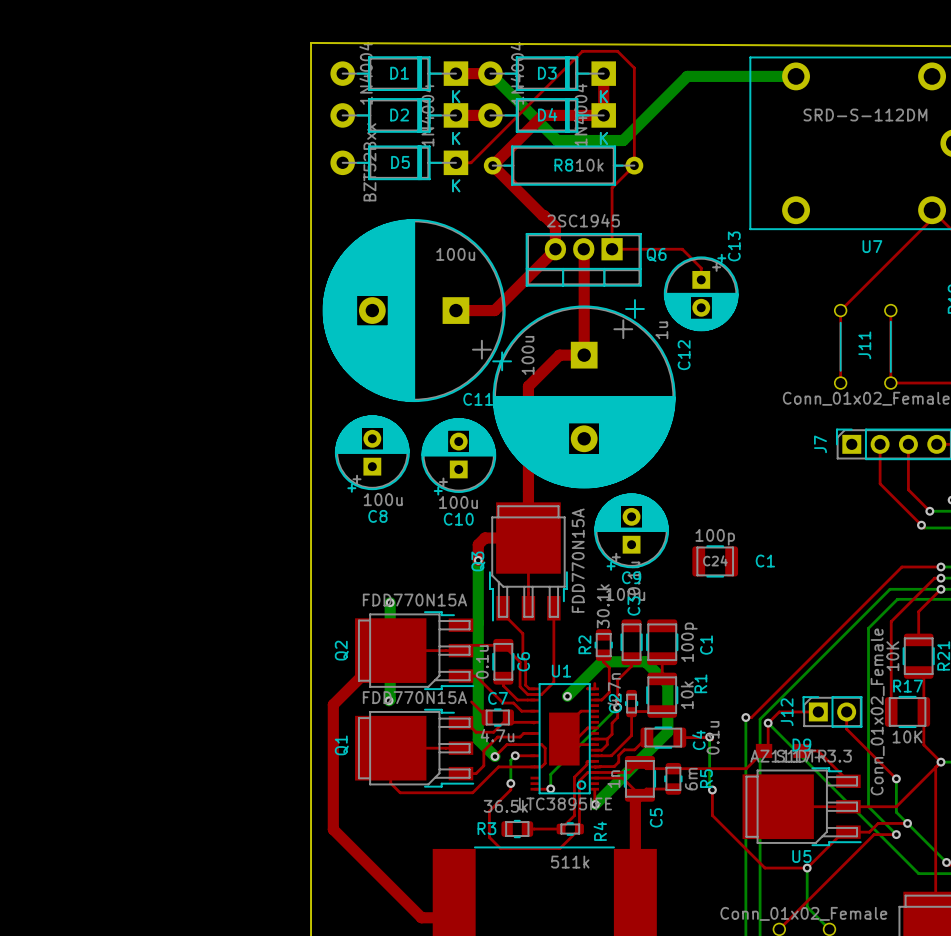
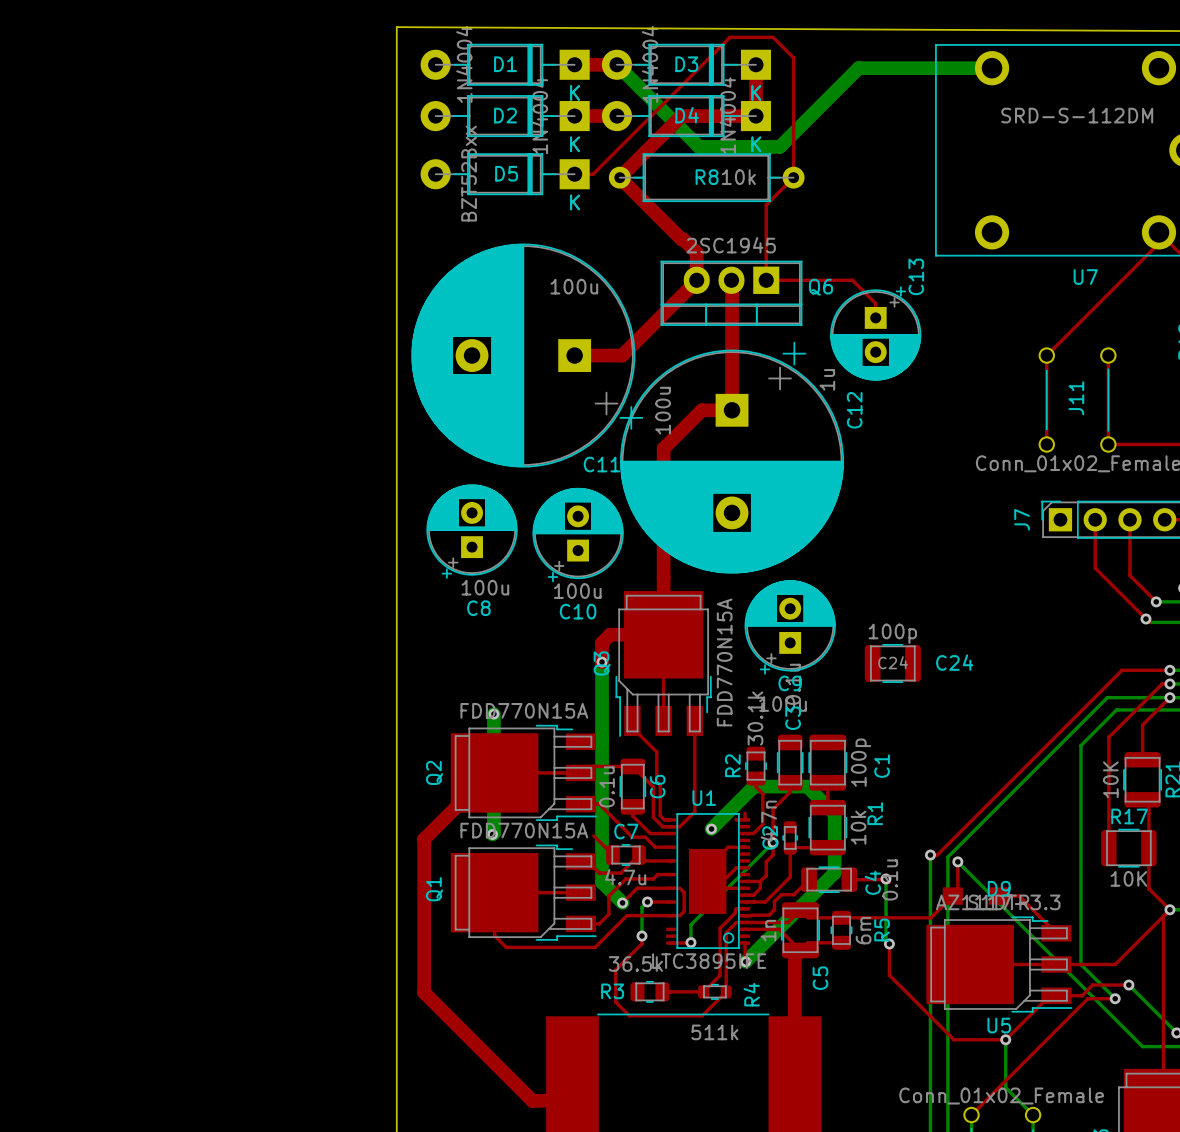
C1 name: C1 (765, 561) -> C24 (954, 662)
top track: (818, 711) (779, 711) (768, 723) -> none
J12: Conn_01x02_Female (832, 711) -> none
top track: (846, 711) (846, 729) (896, 778) -> none
bottom track: (896, 778) (896, 812) (907, 823) -> none
via: (896, 778) -> none

